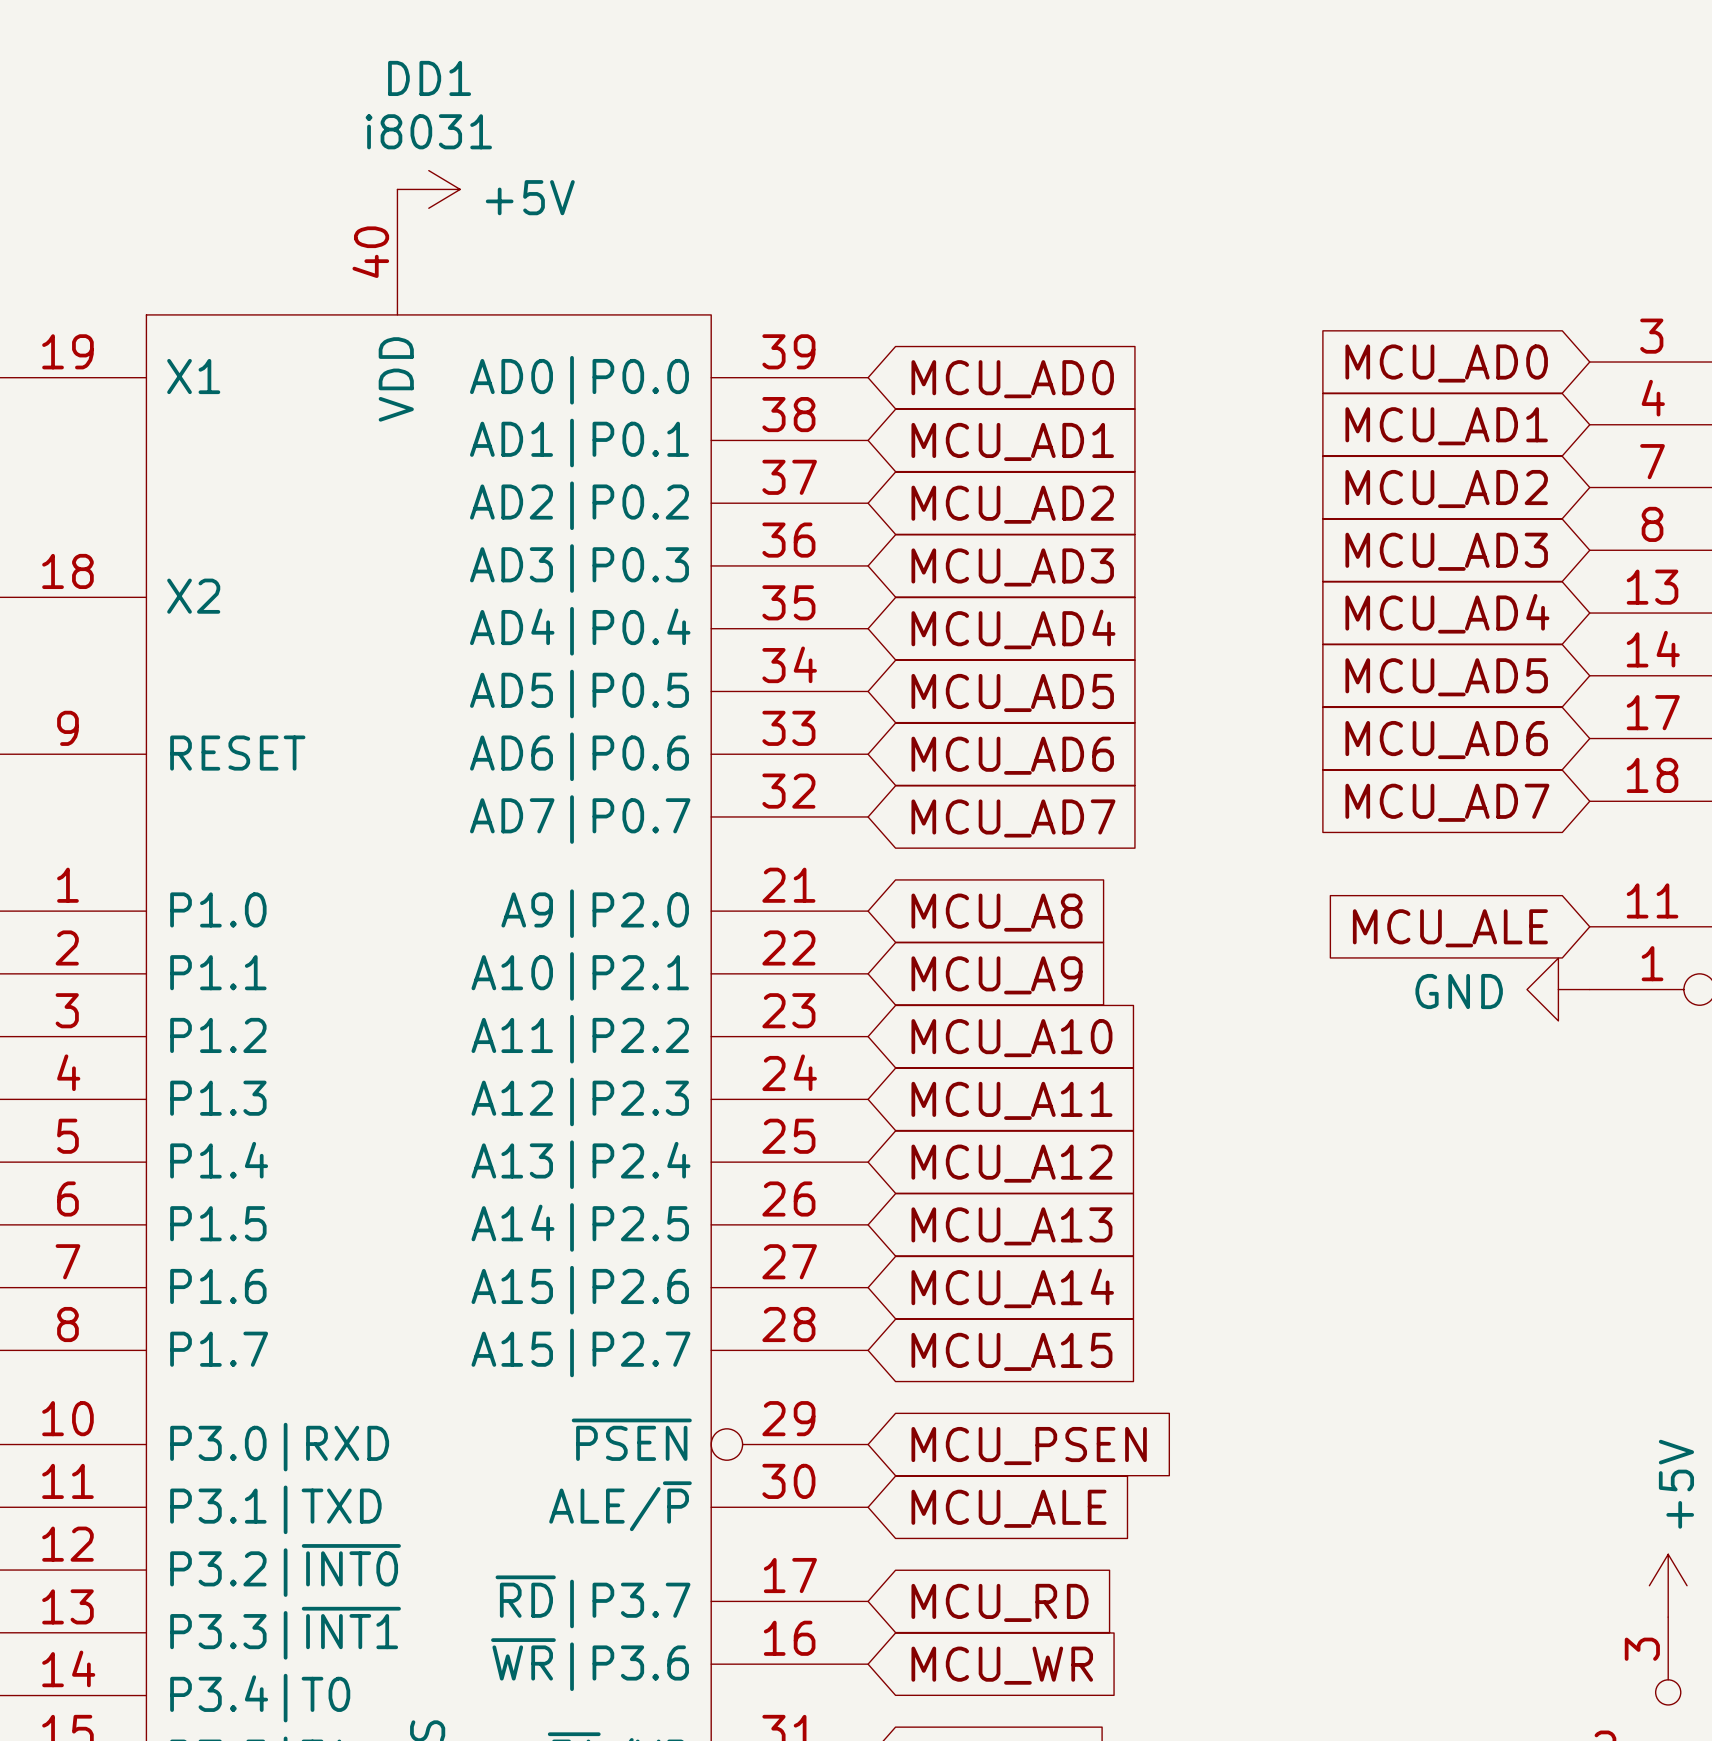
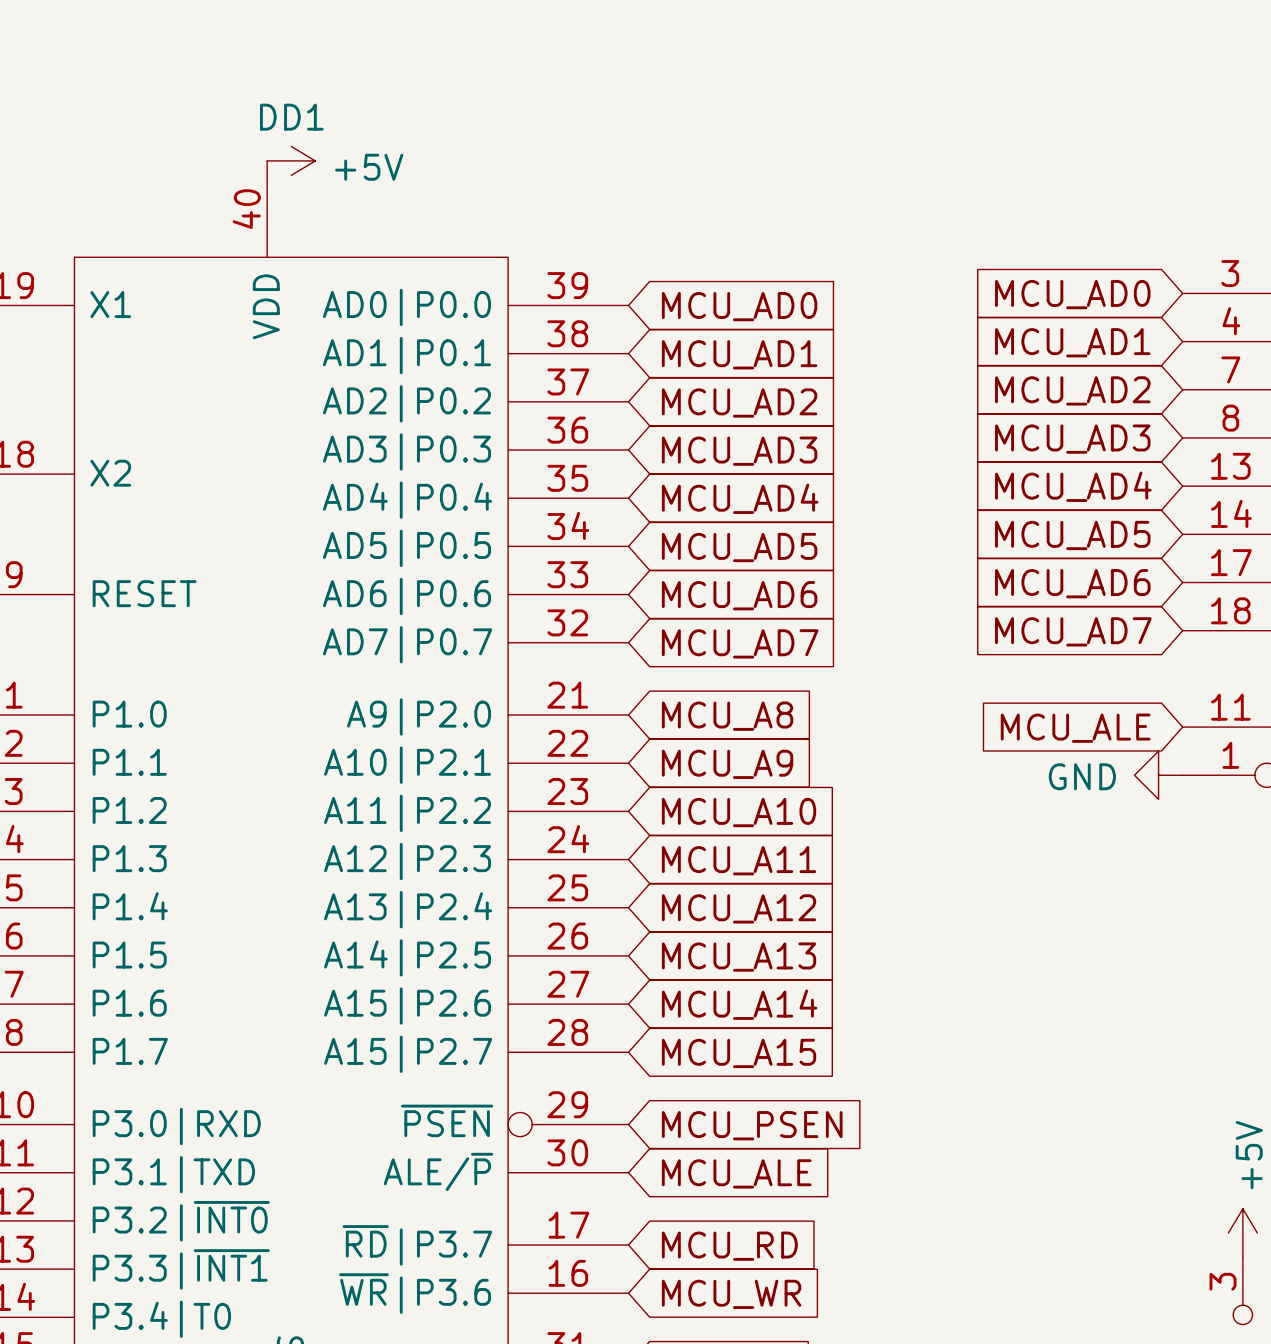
DD1 name position: DD1 (429, 78) -> DD1 (291, 117)
DD1 value: i8031 (428, 131) -> none

